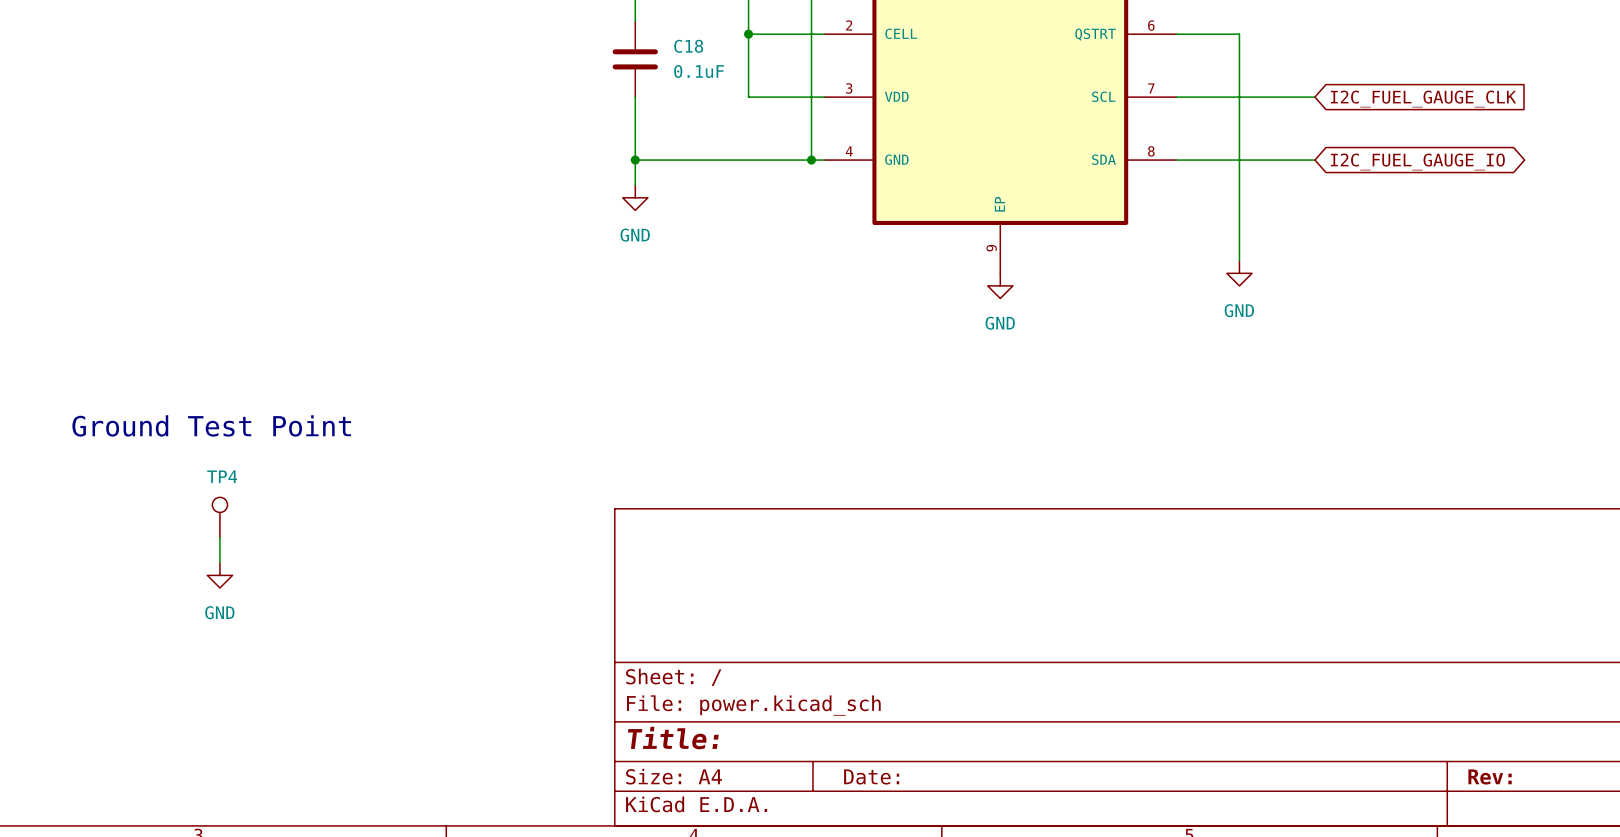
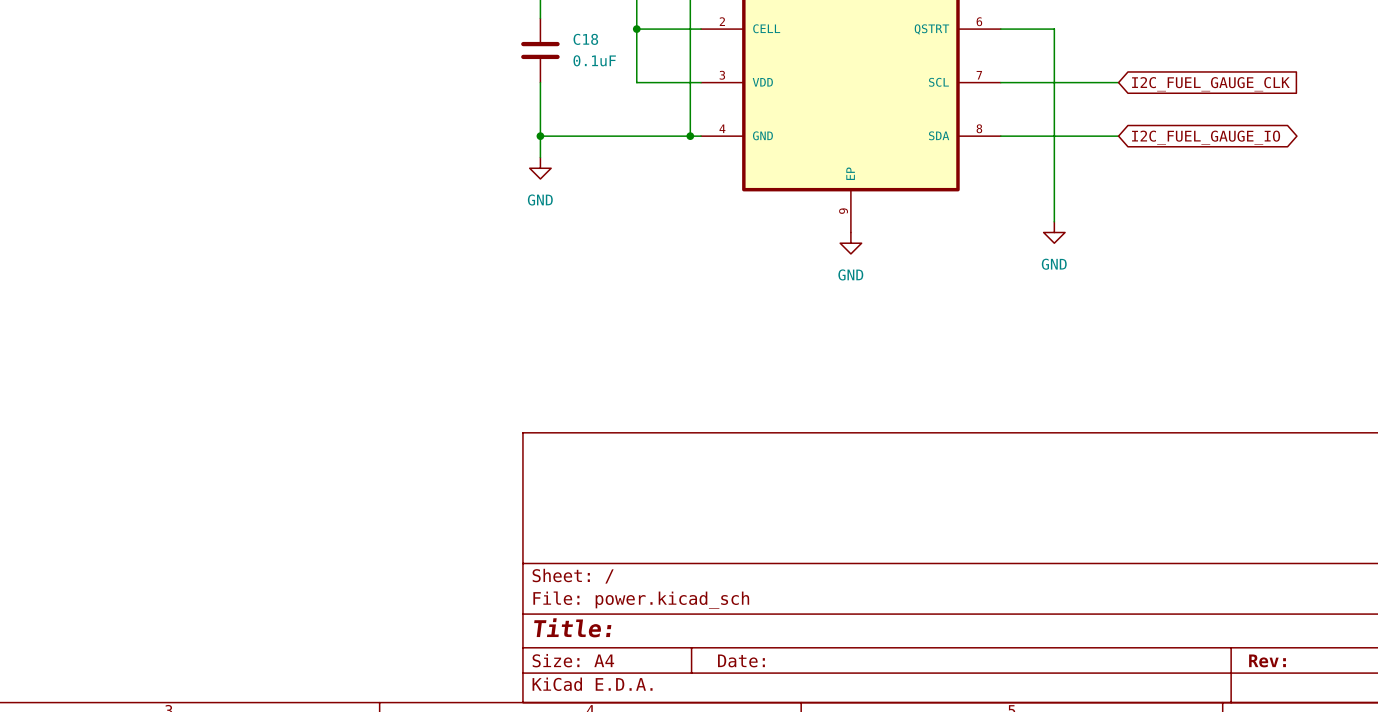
text: Ground Test Point (211, 425) -> none
TP4: (219, 517) -> none
wire: (219, 537) (219, 562) -> none
power symbol: GND (219, 575) -> none

